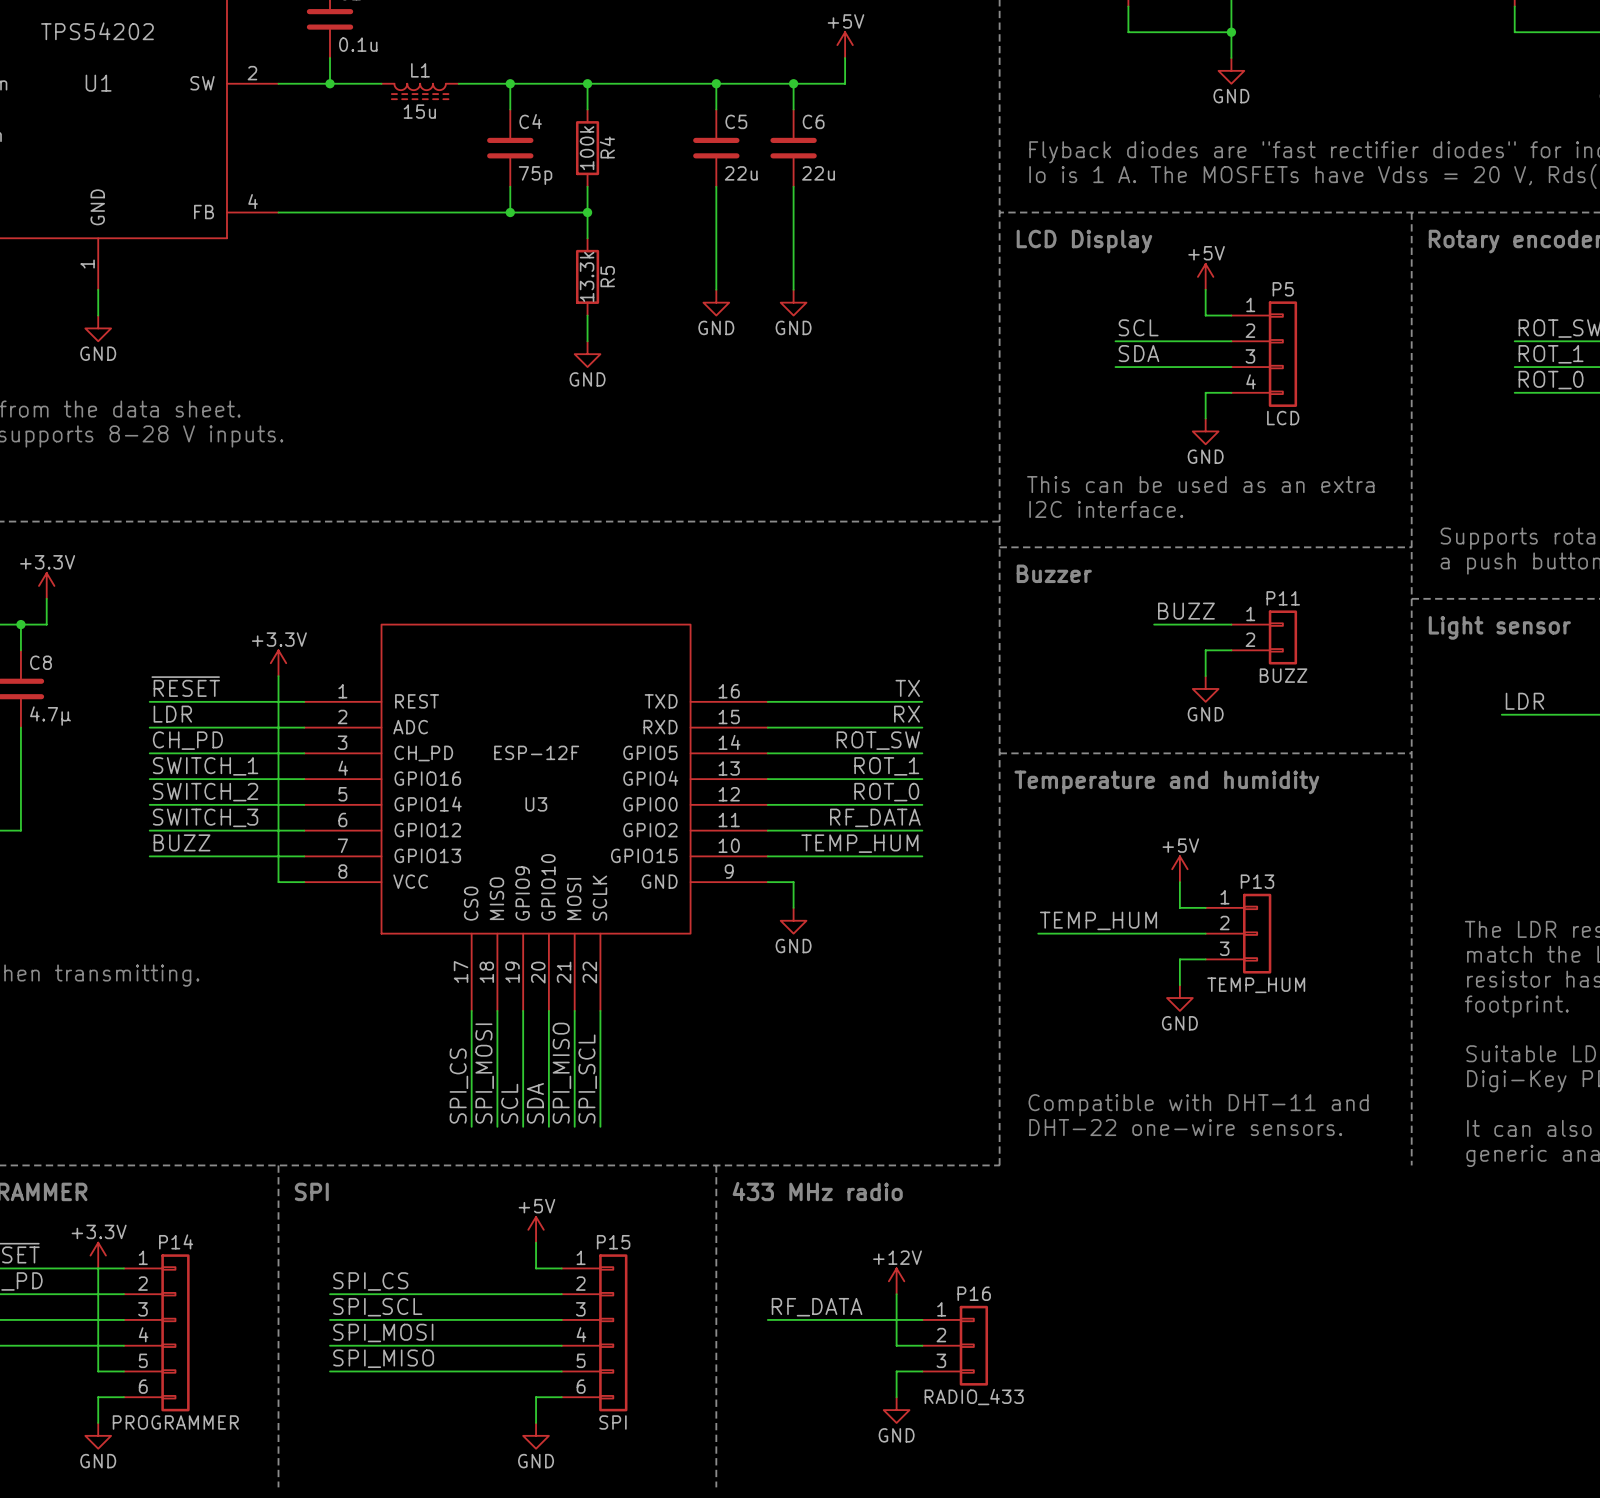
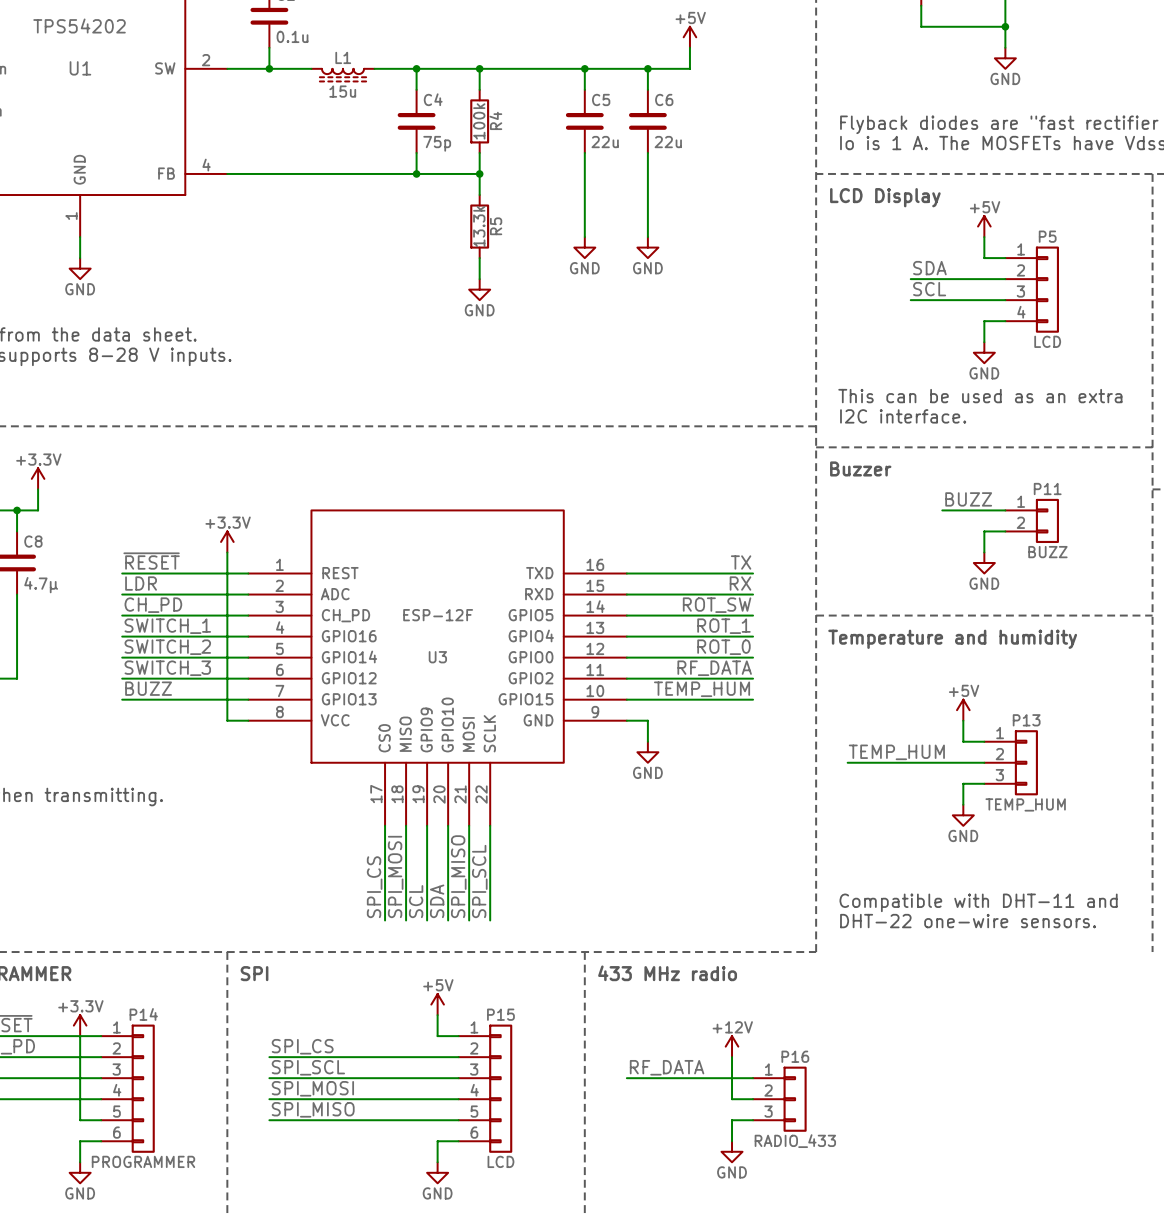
label: SCL (1138, 327) -> SDA (929, 268)
label: SDA (1138, 353) -> SCL (929, 289)
P15 value: SPI (613, 1422) -> LCD (500, 1161)

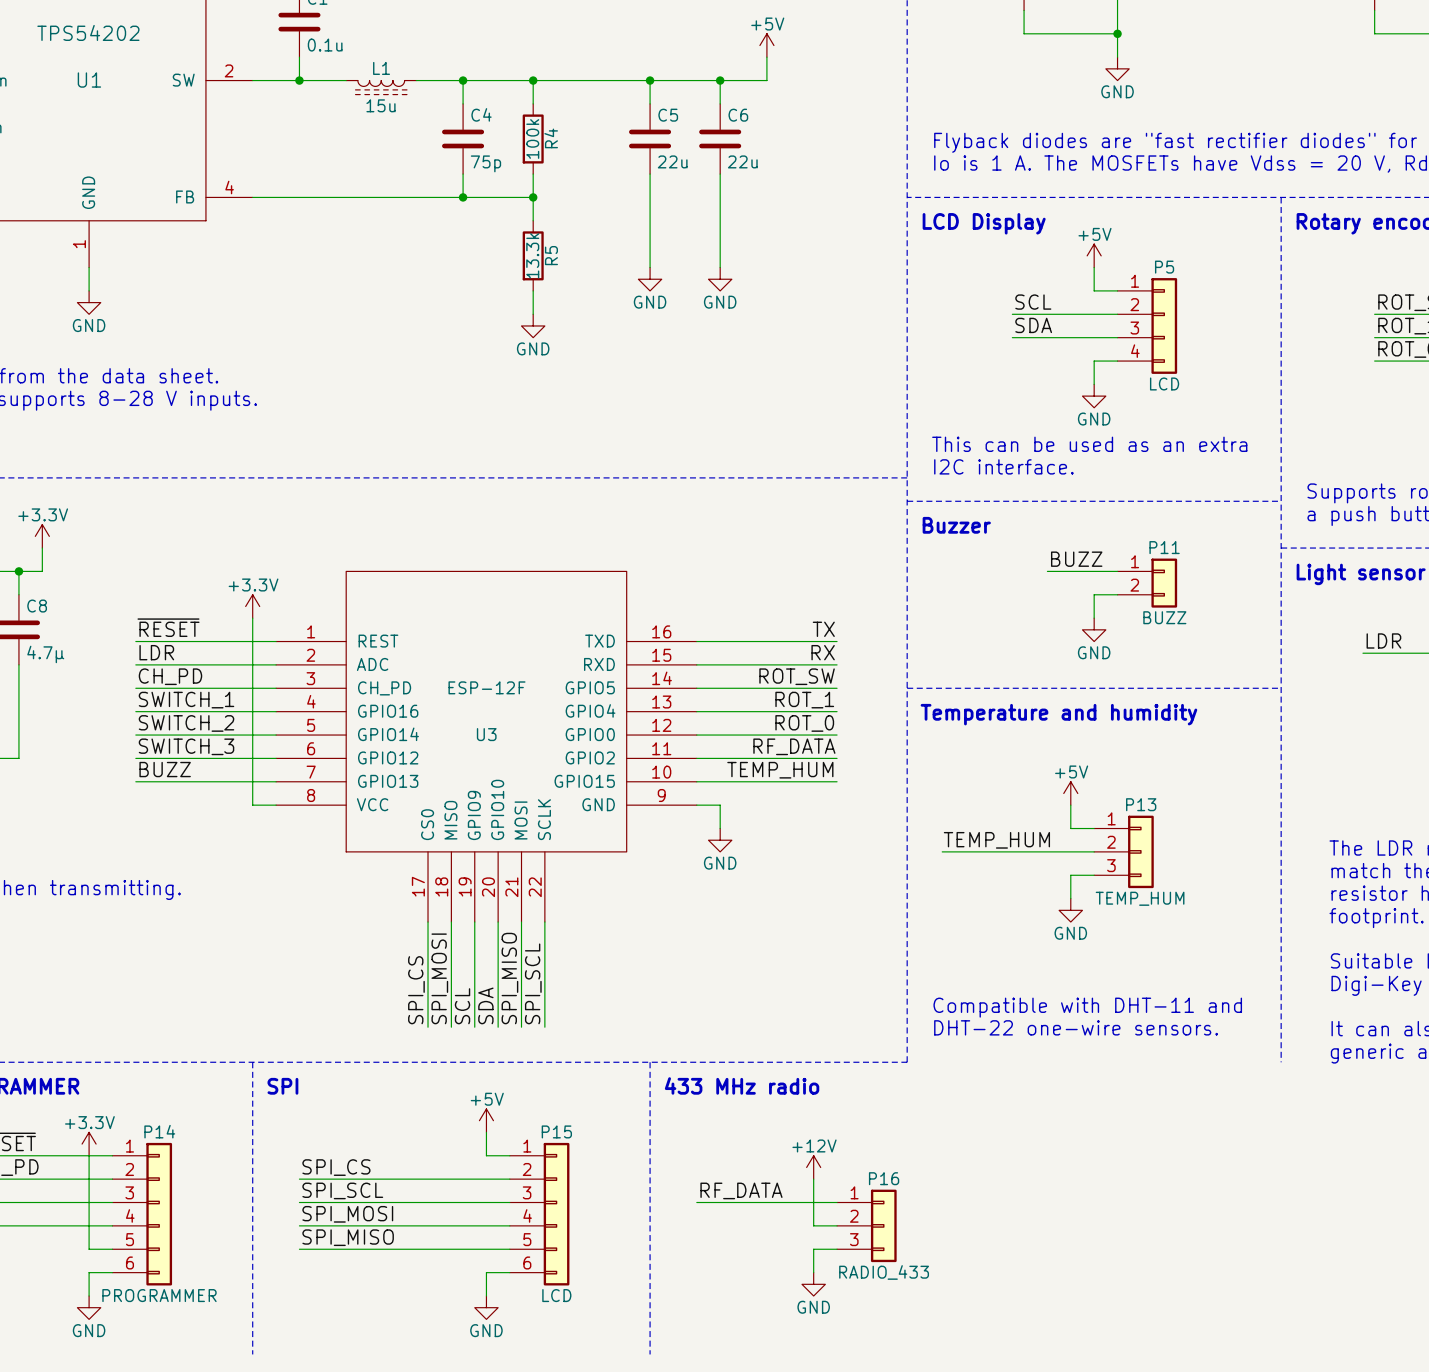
label: SDA (929, 268) -> SCL (1033, 302)
label: SCL (929, 289) -> SDA (1033, 325)

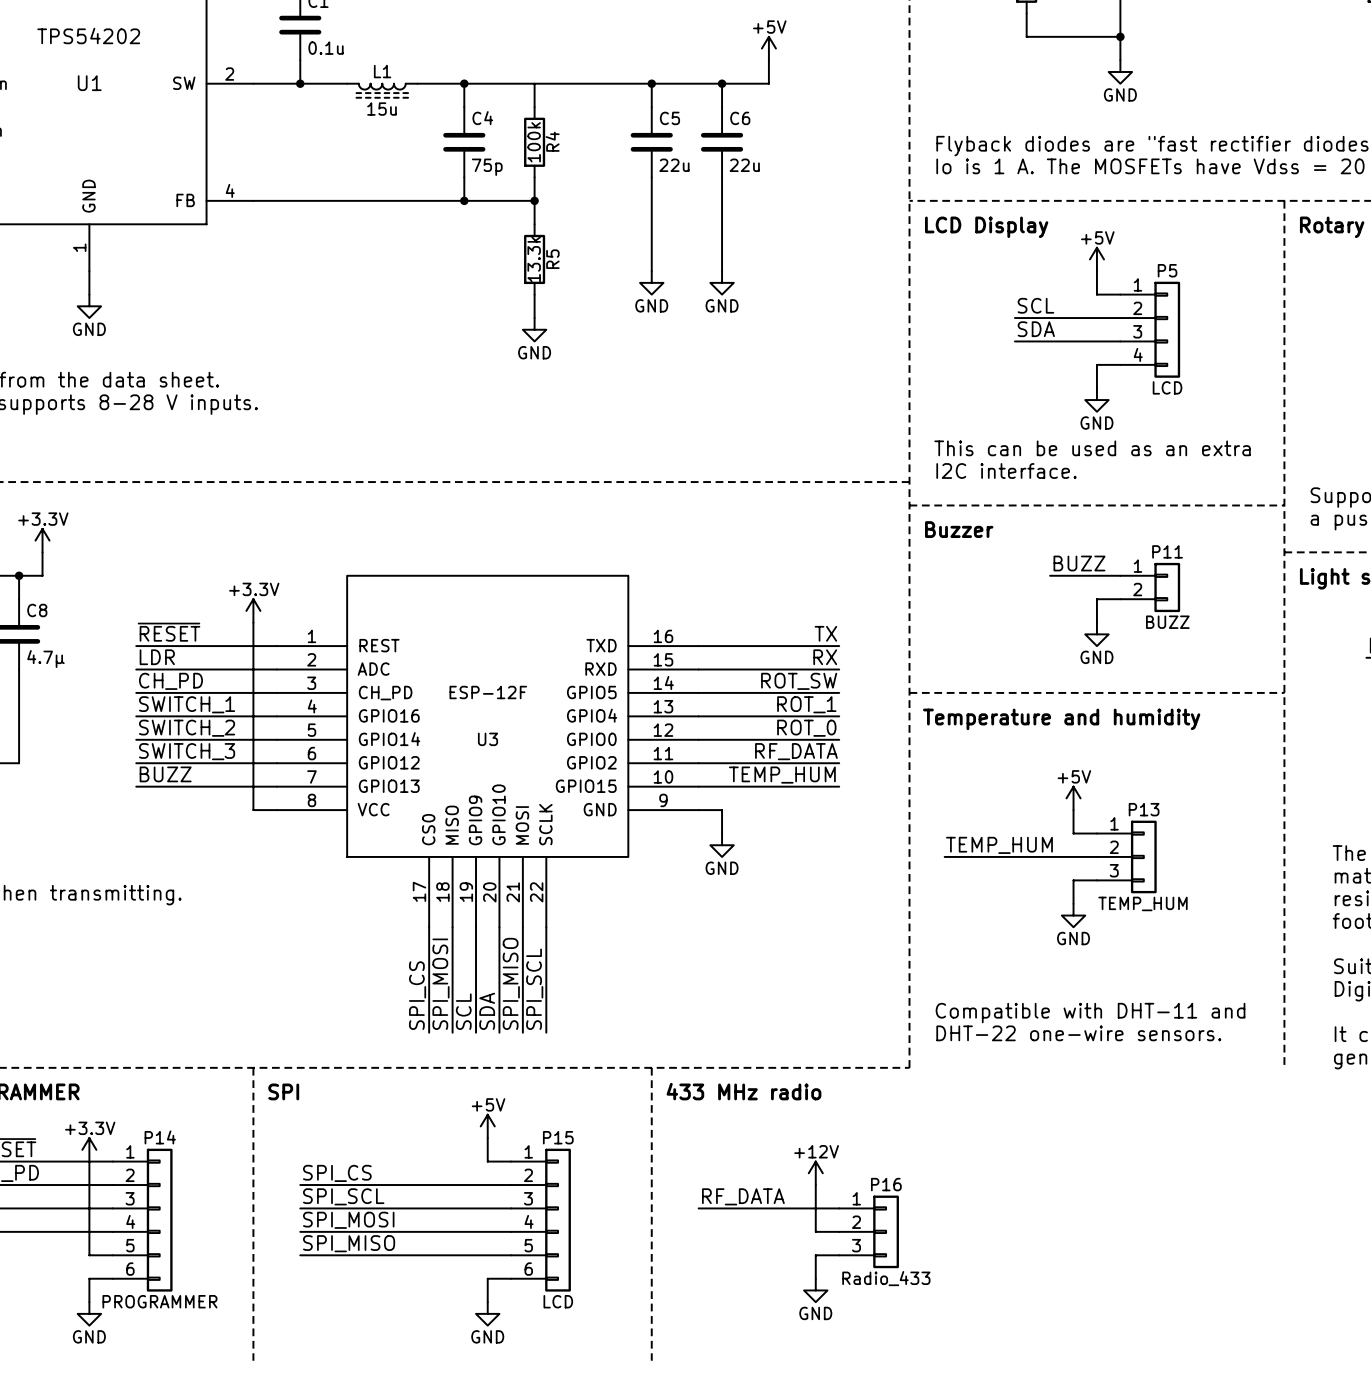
junction: (533, 80) -> none
P16 value: RADIO_433 (884, 1272) -> Radio_433 (886, 1278)

